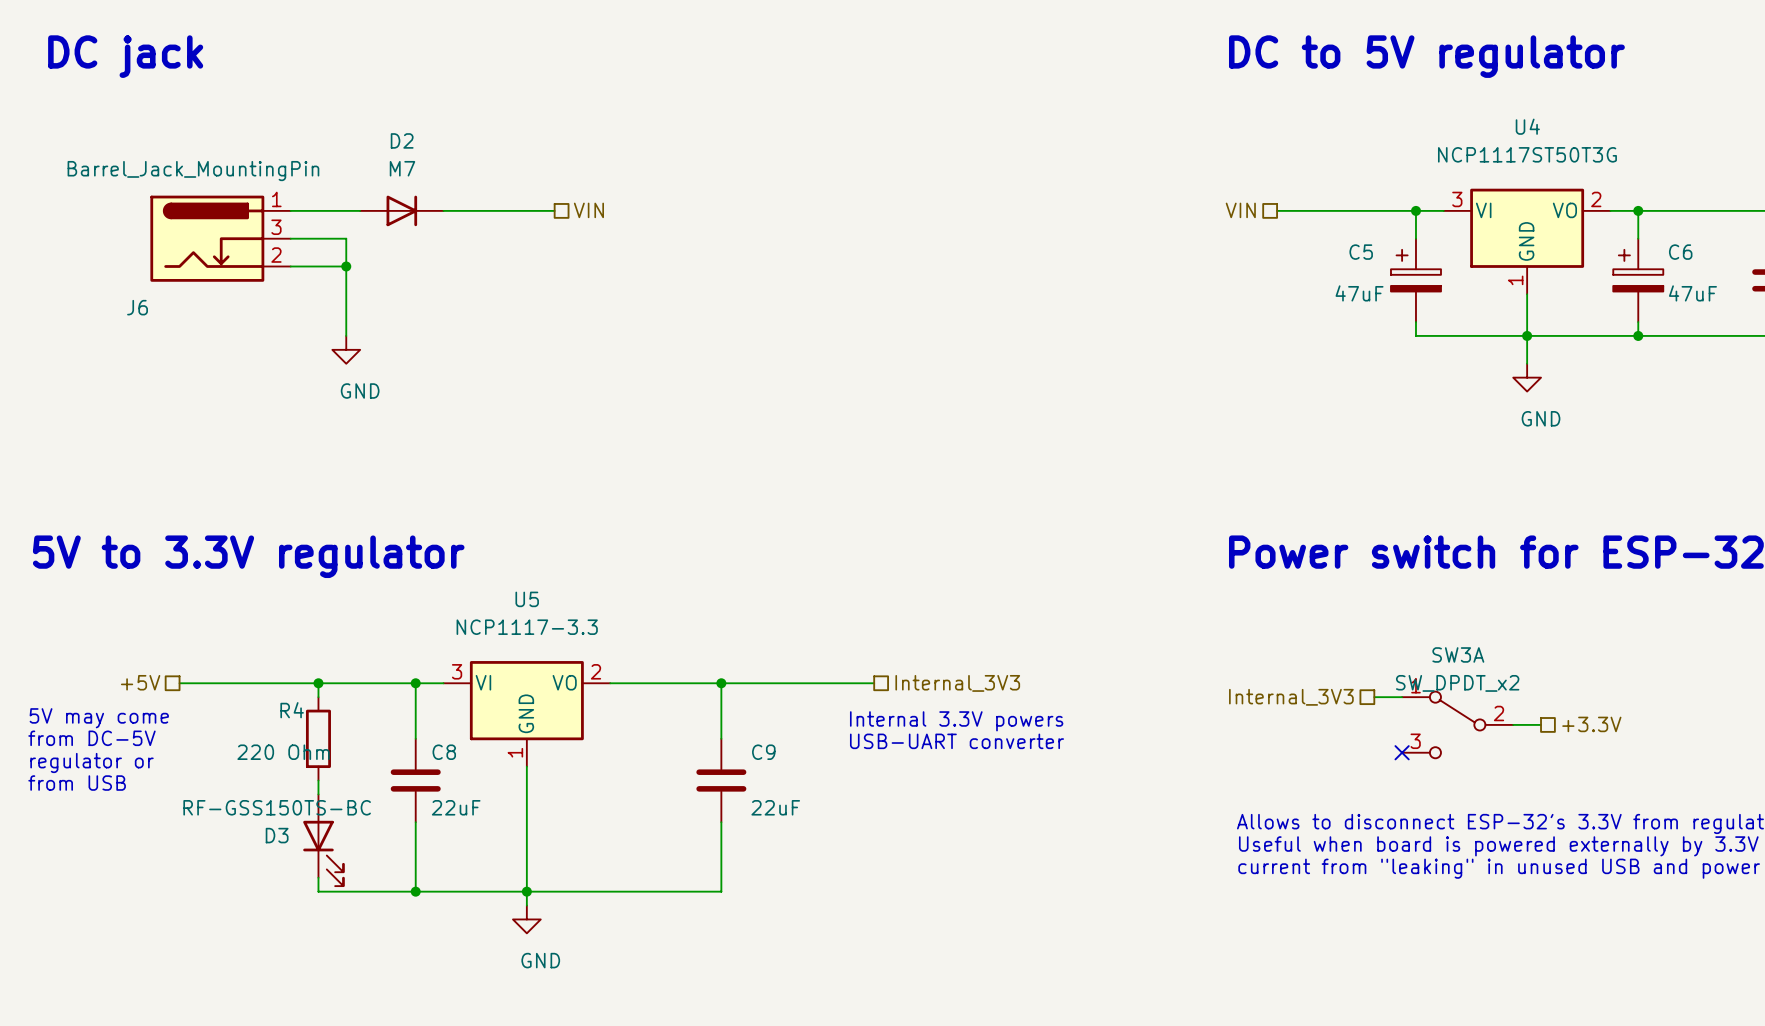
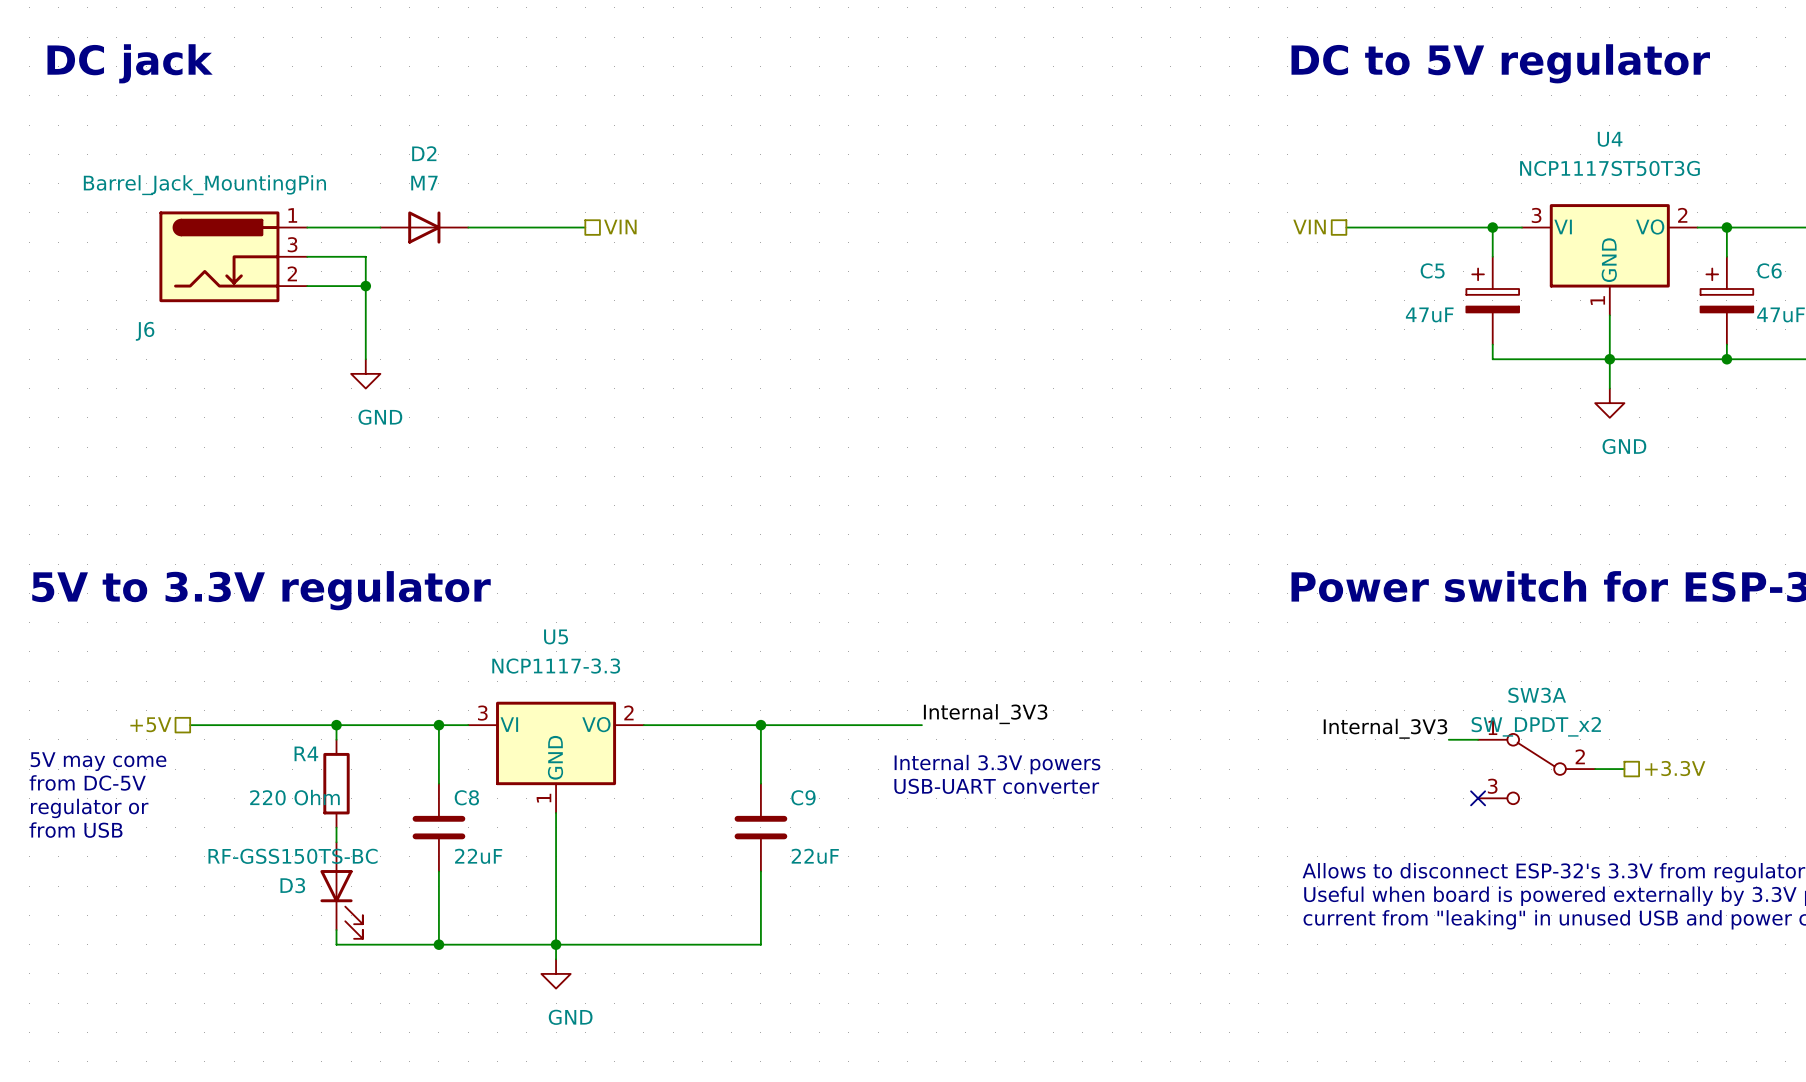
label: none -> Internal_3V3 (985, 714)
hierarchical label: Internal_3V3 (957, 683) -> none
label: none -> Internal_3V3 (1385, 728)
hierarchical label: Internal_3V3 (1291, 697) -> none

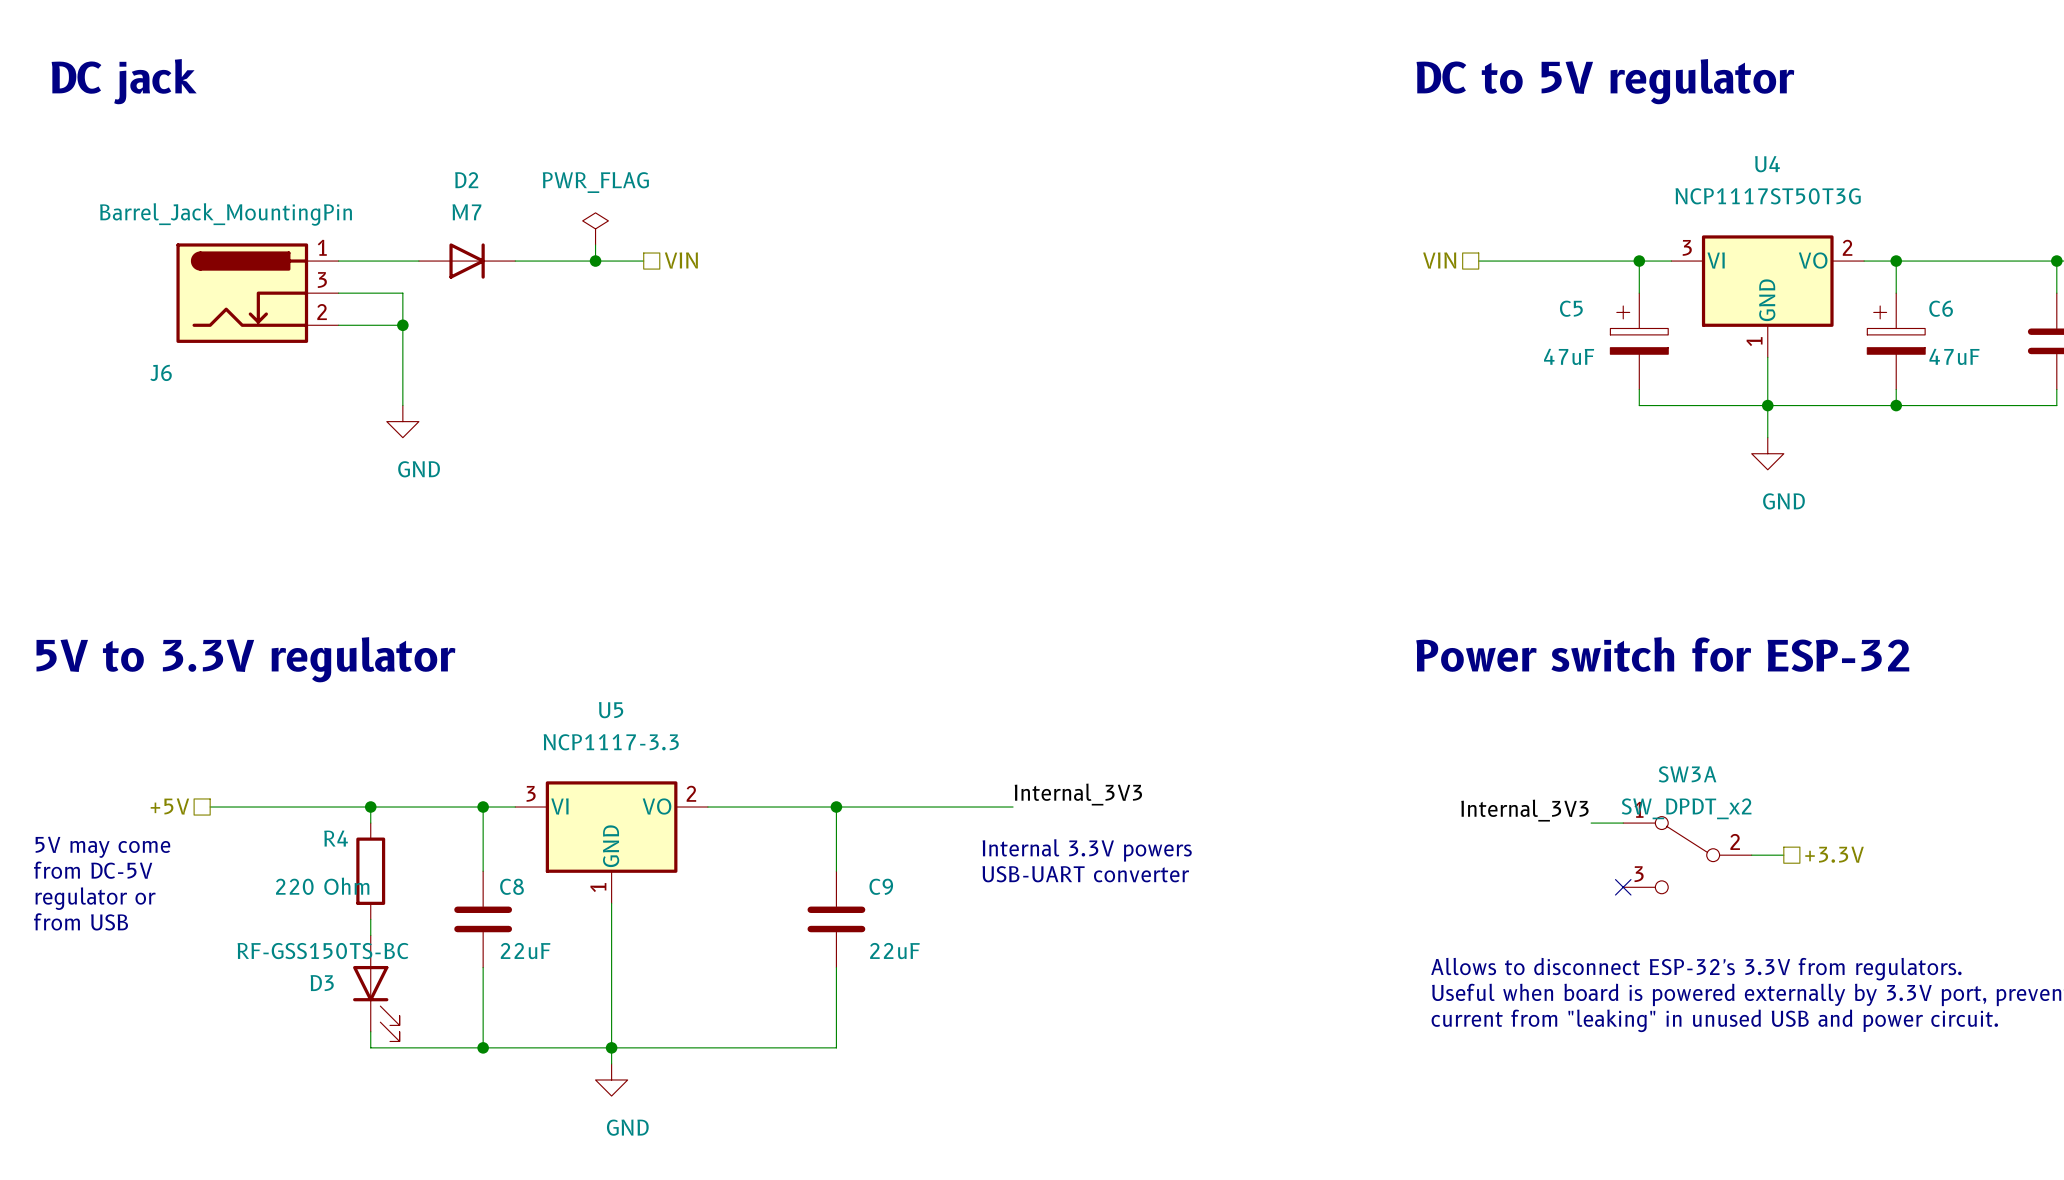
power symbol: none -> PWR_FLAG (595, 228)
wire: none -> (595, 244) (595, 261)
junction: none -> (595, 261)

